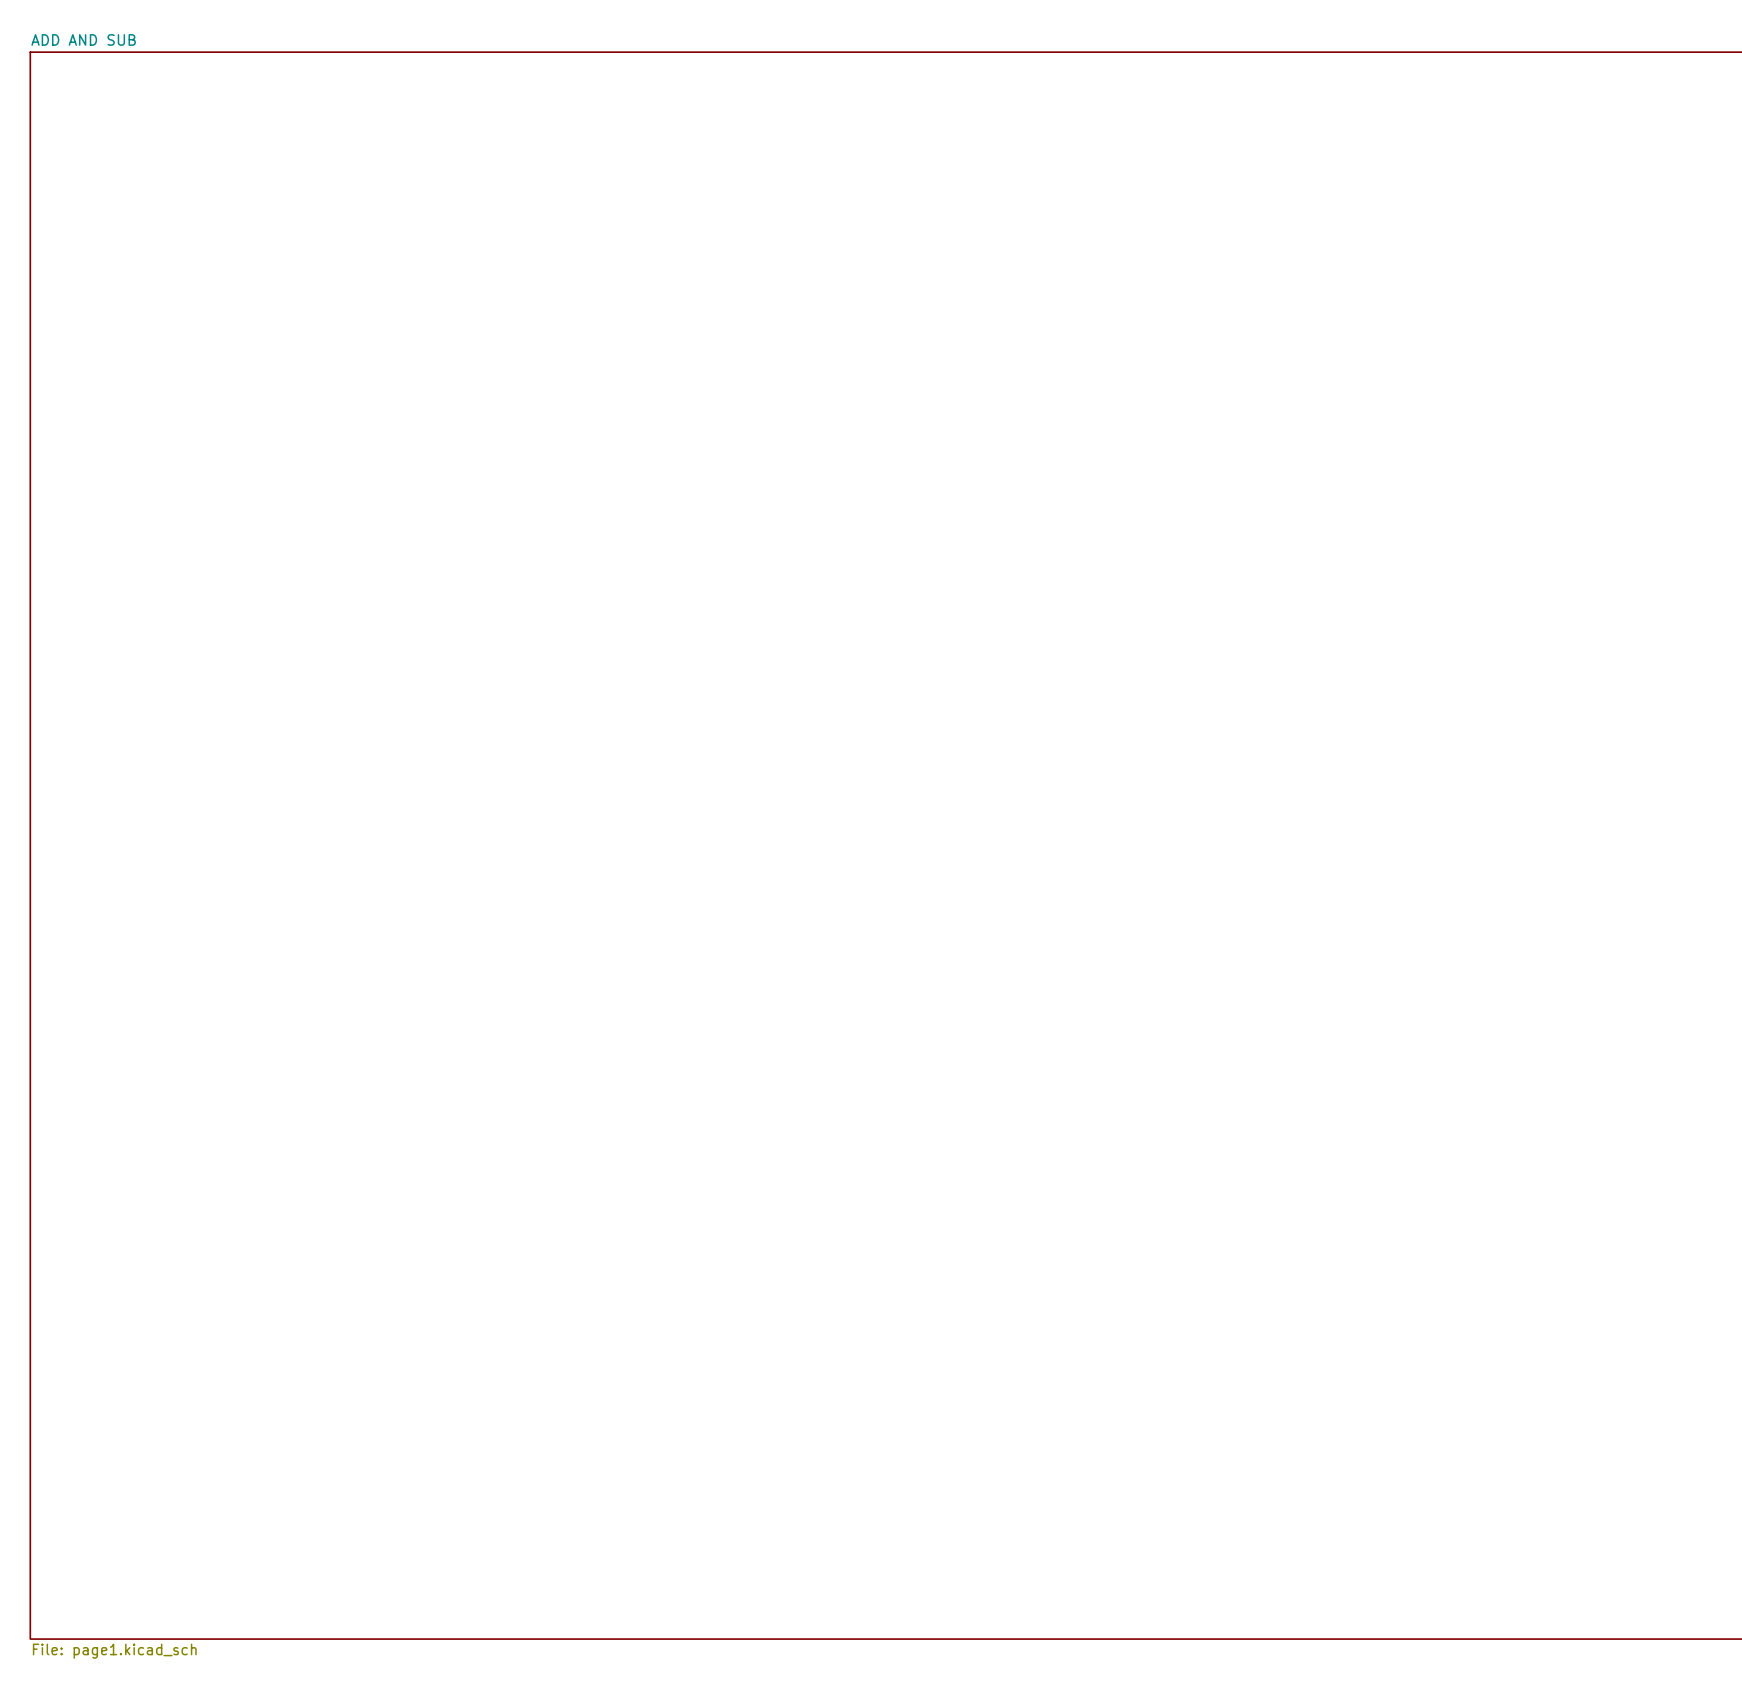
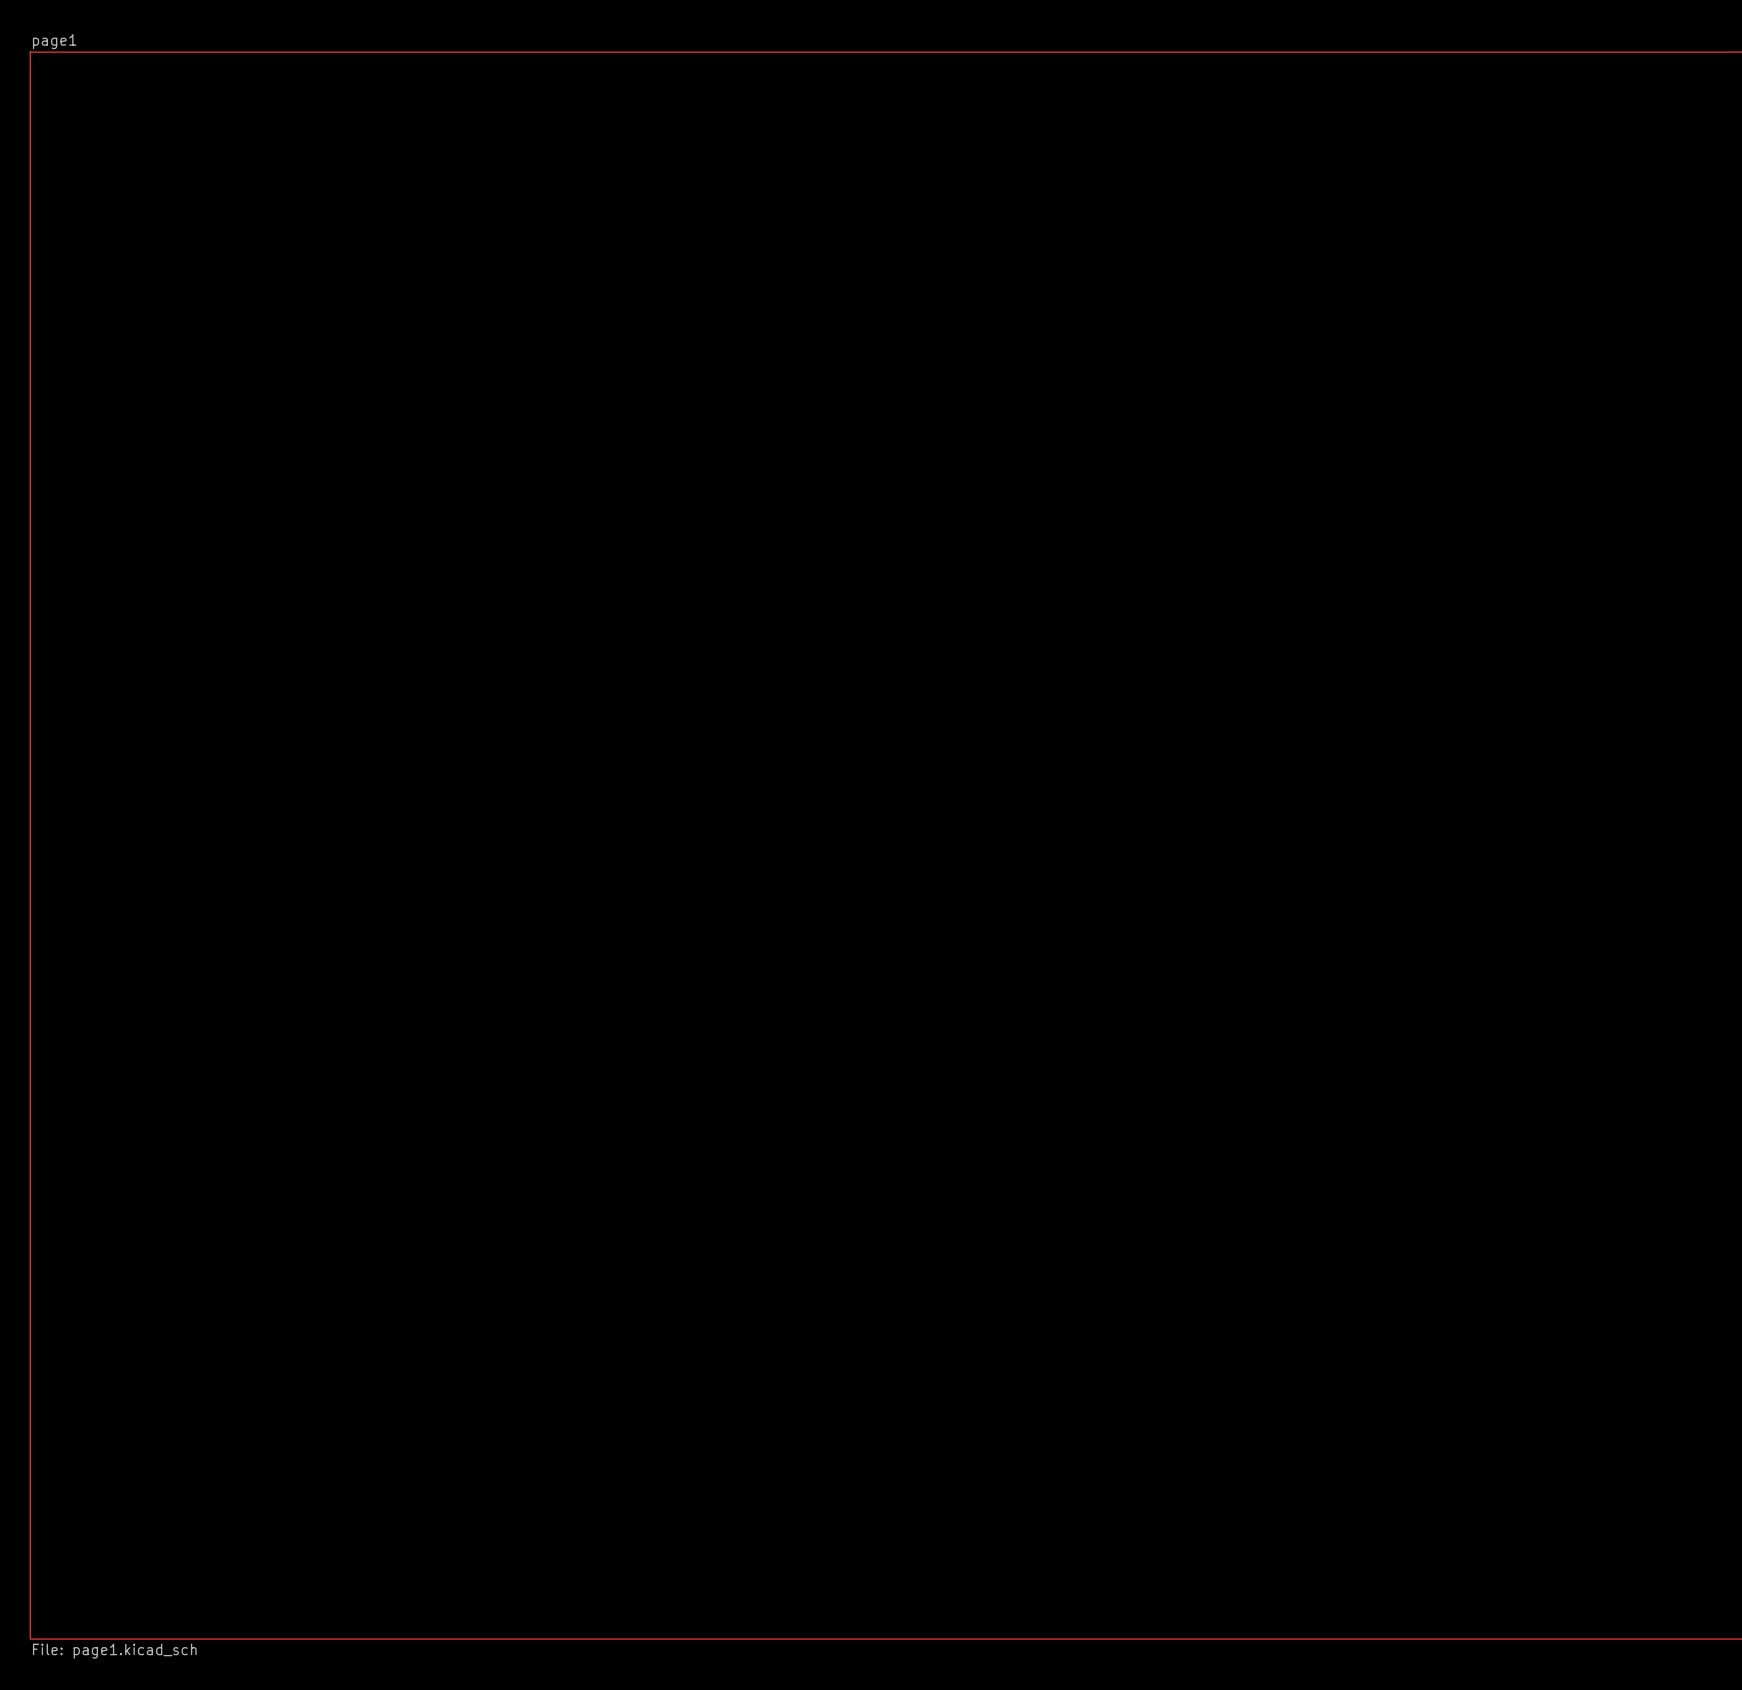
sheet ADD AND SUB name: ADD AND SUB (83, 39) -> page1 (54, 41)

